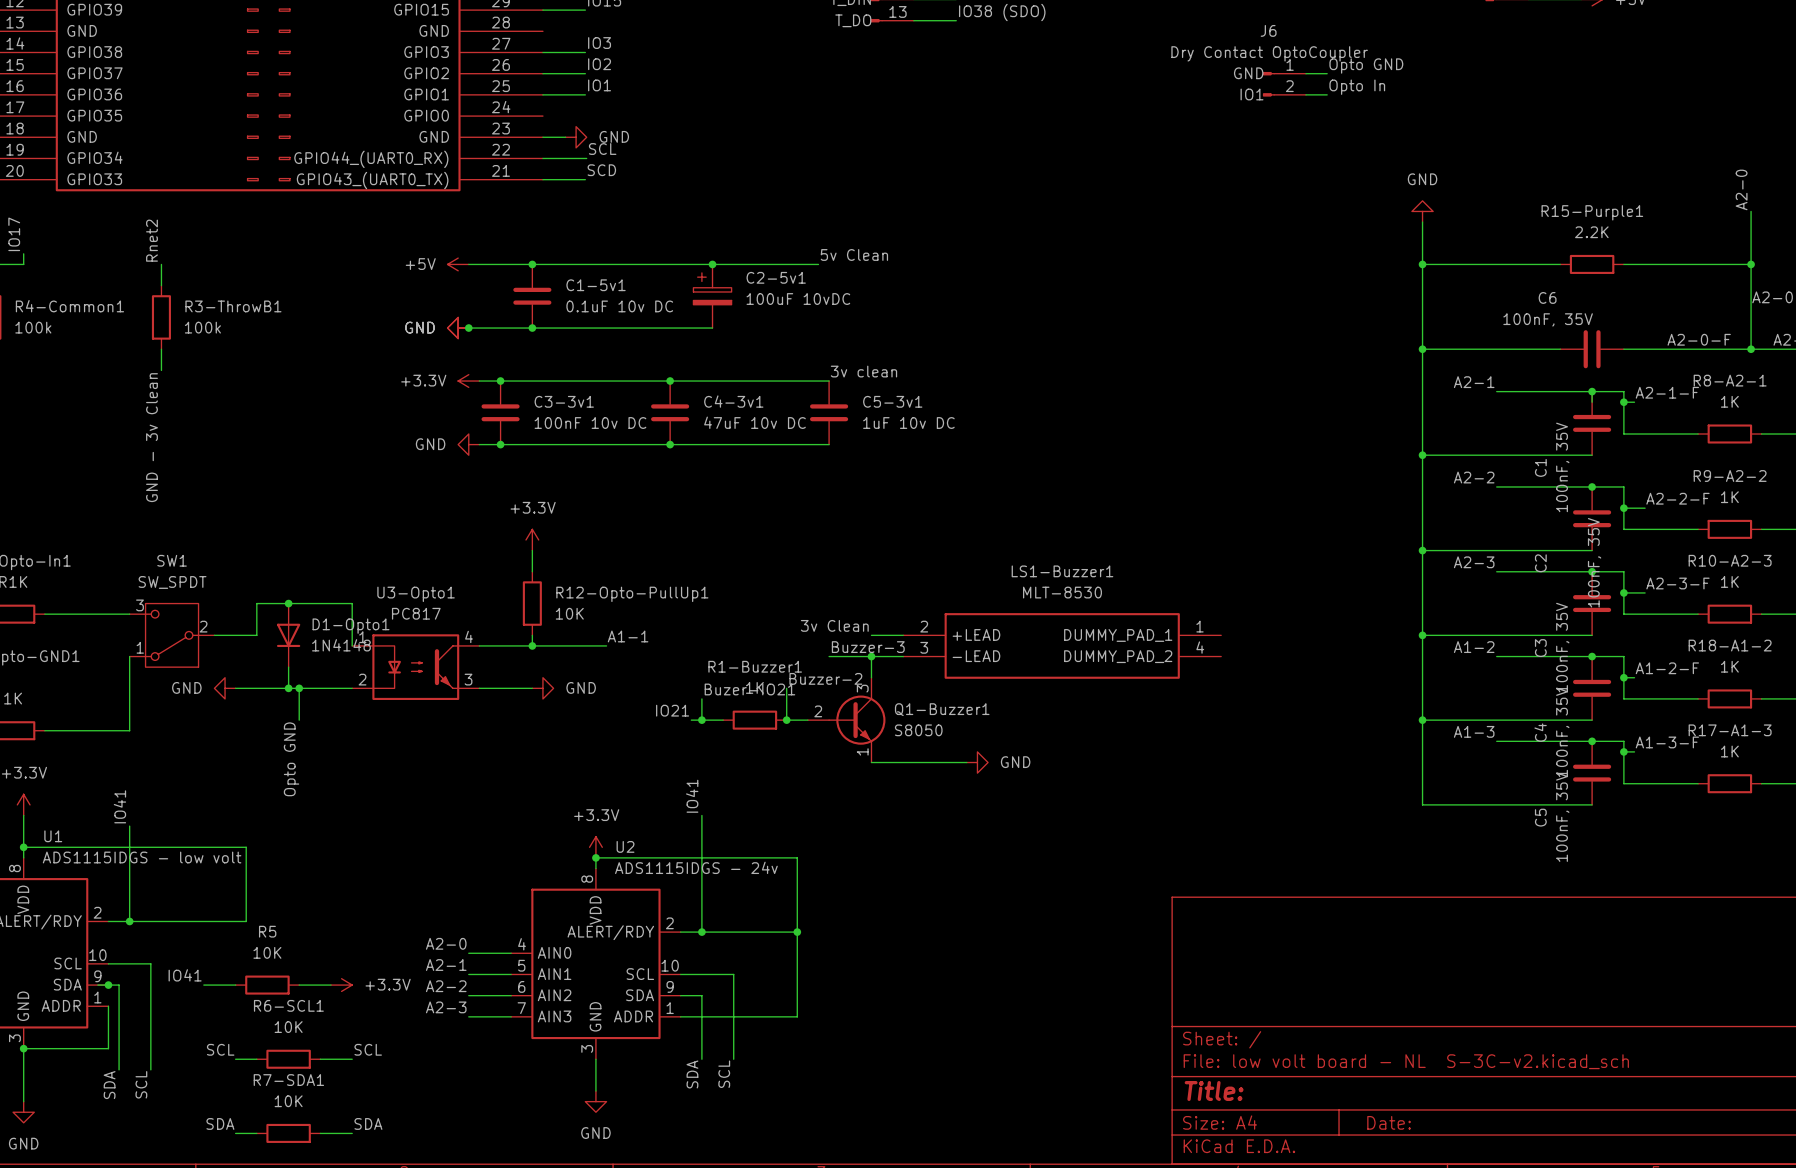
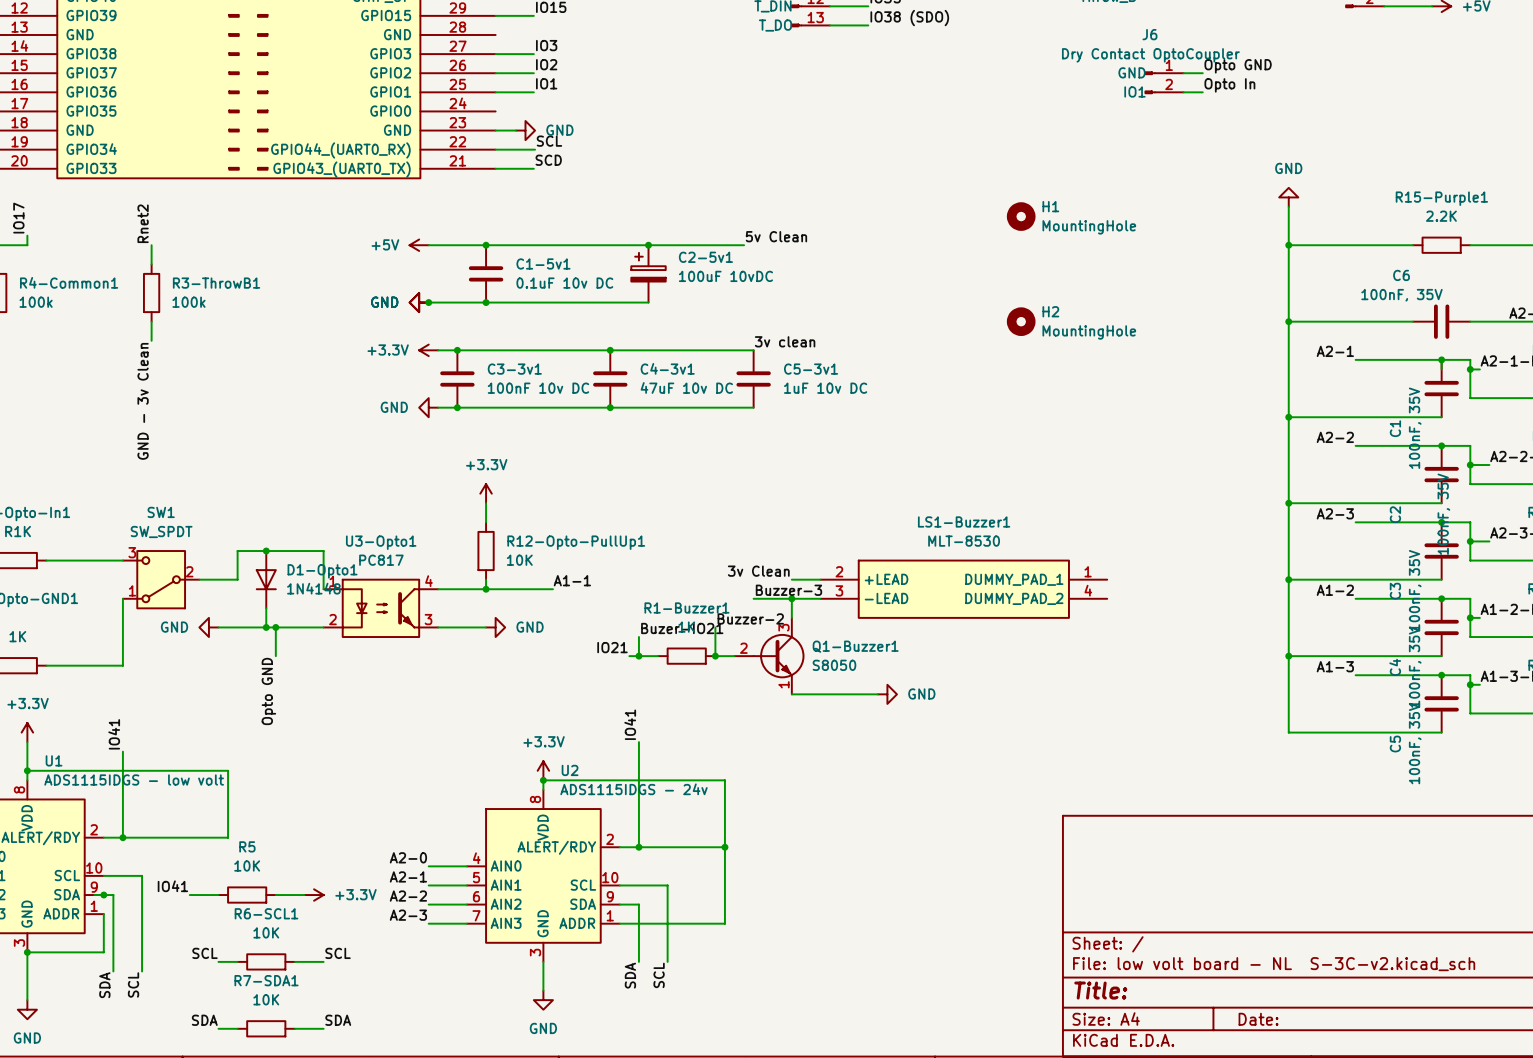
H1: none -> MountingHole (1021, 216)
H2: none -> MountingHole (1021, 321)

